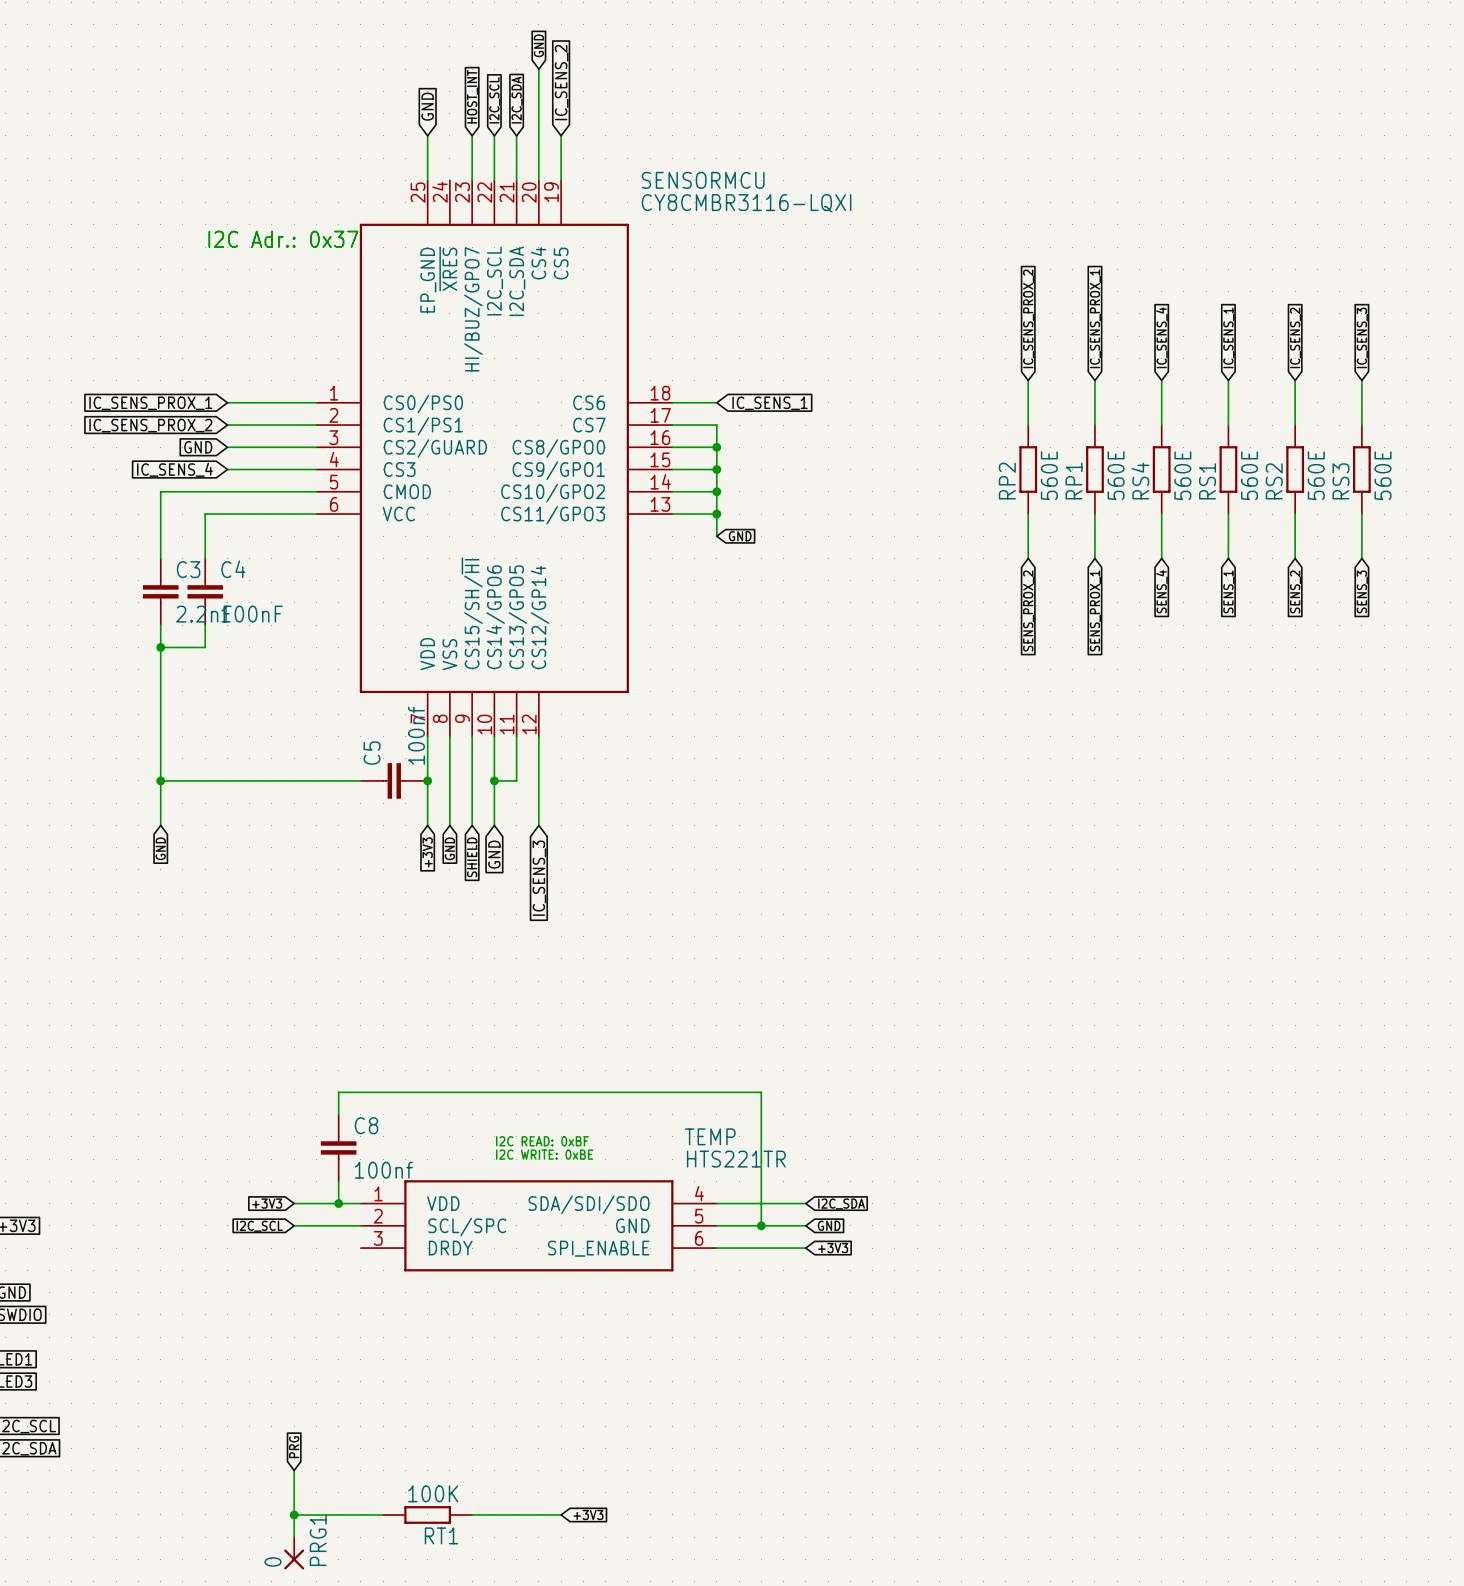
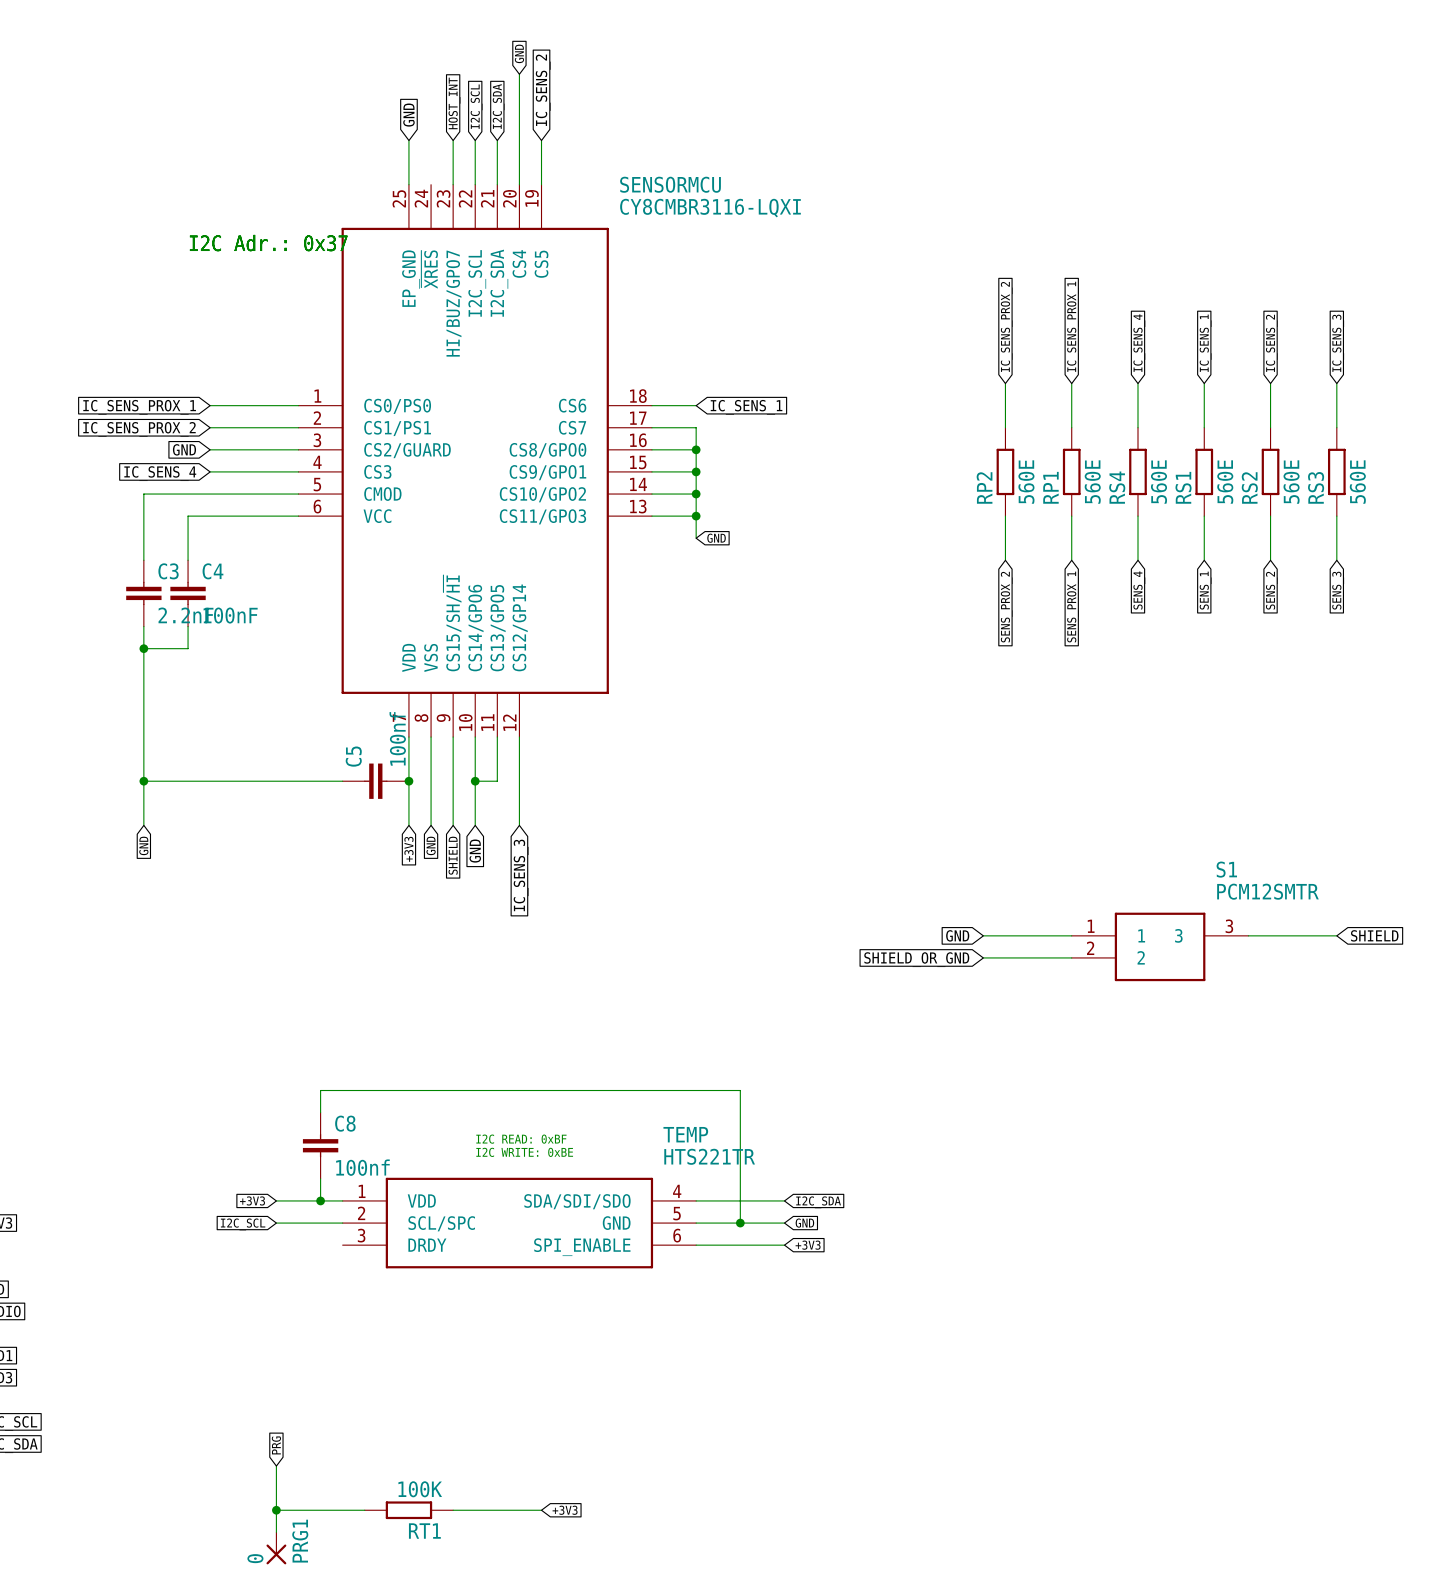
global label: none -> GND (957, 935)
wire: none -> (983, 935) (1071, 935)
wire: none -> (1248, 935) (1336, 935)
global label: none -> SHIELD (1374, 935)
S1: none -> PCM12SMTR (1160, 946)
wire: none -> (983, 957) (1071, 957)
global label: none -> SHIELD_OR_GND (916, 959)

